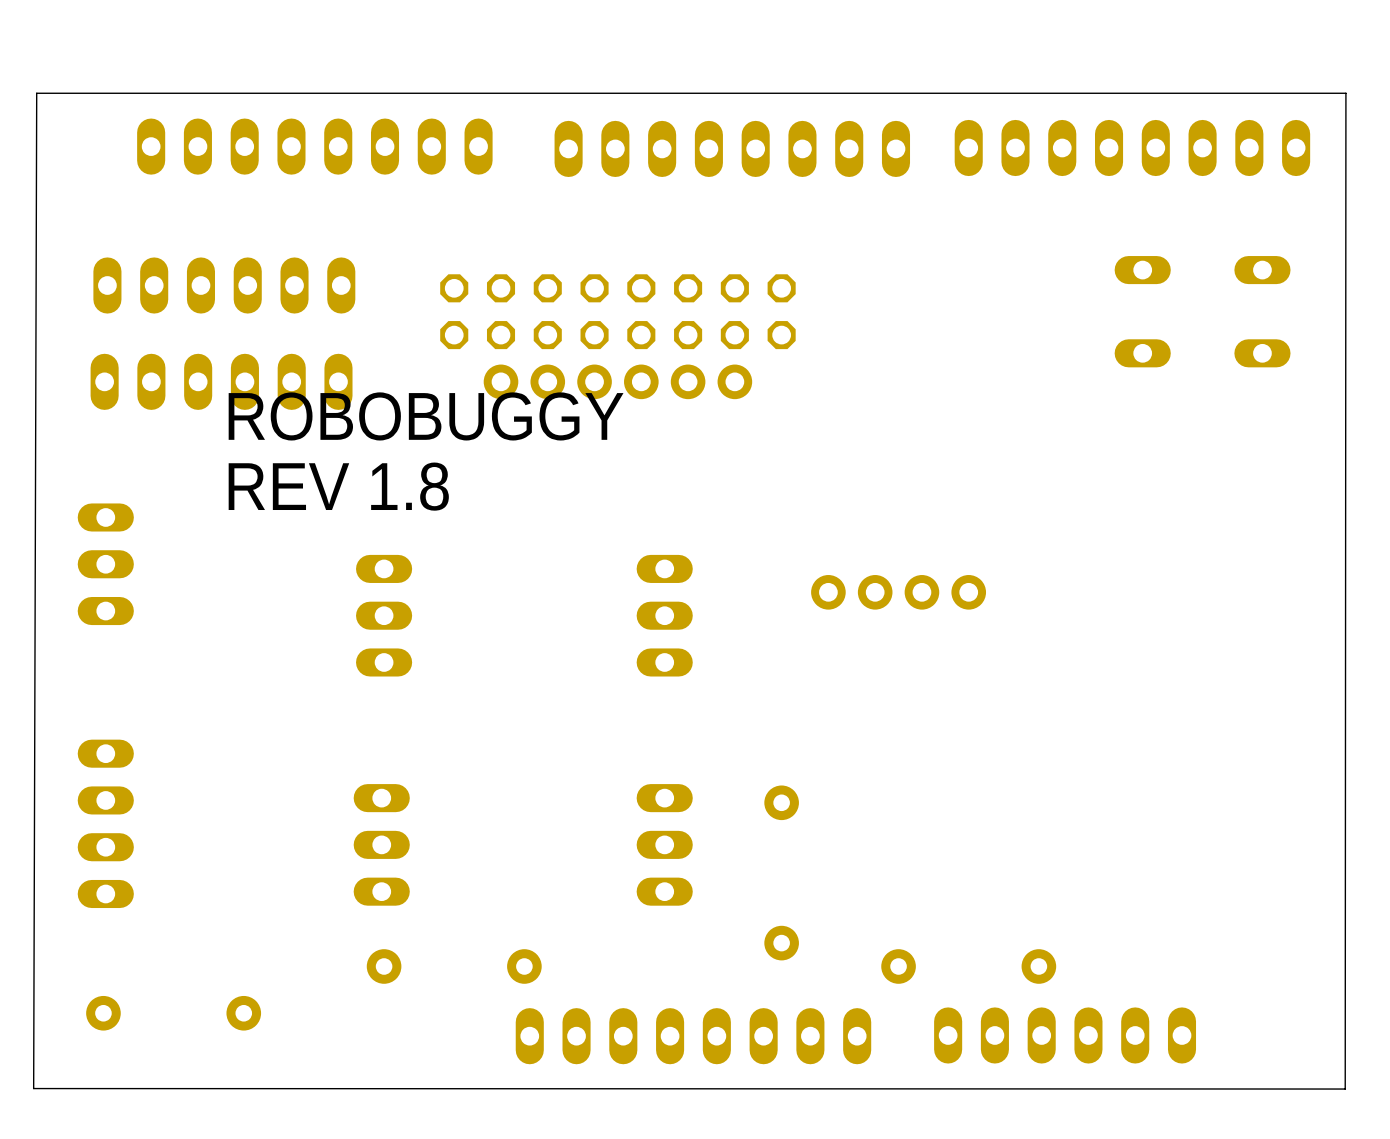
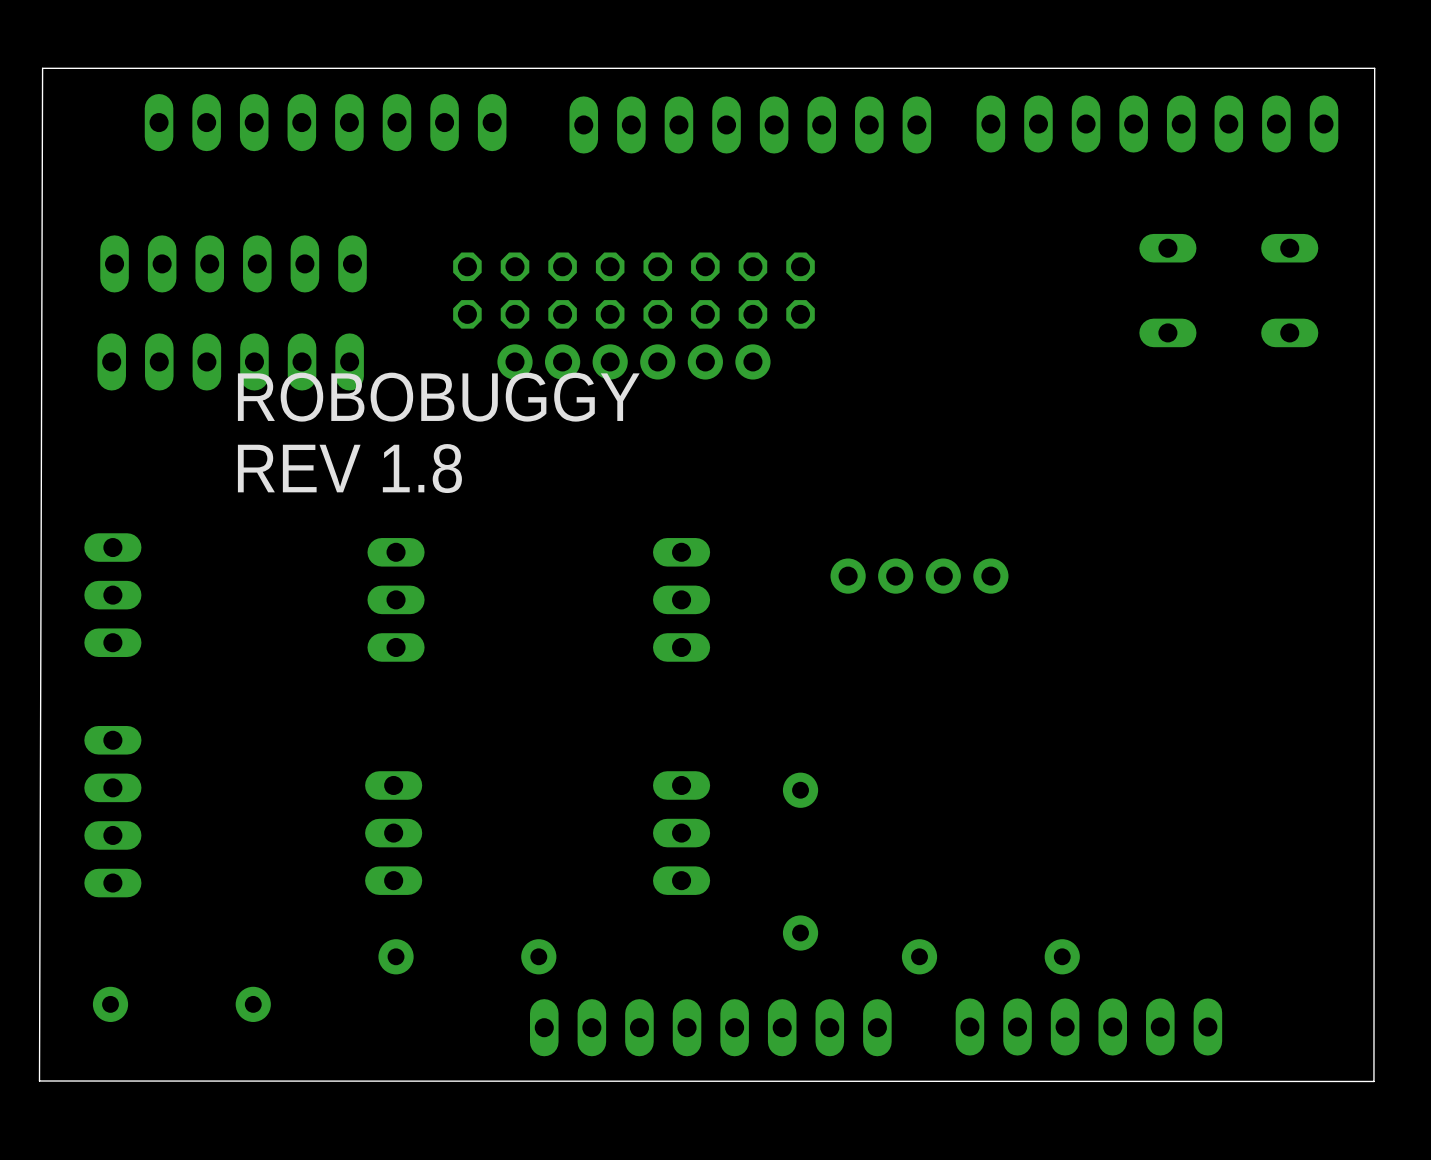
part position: (105, 564) -> (112, 595)

